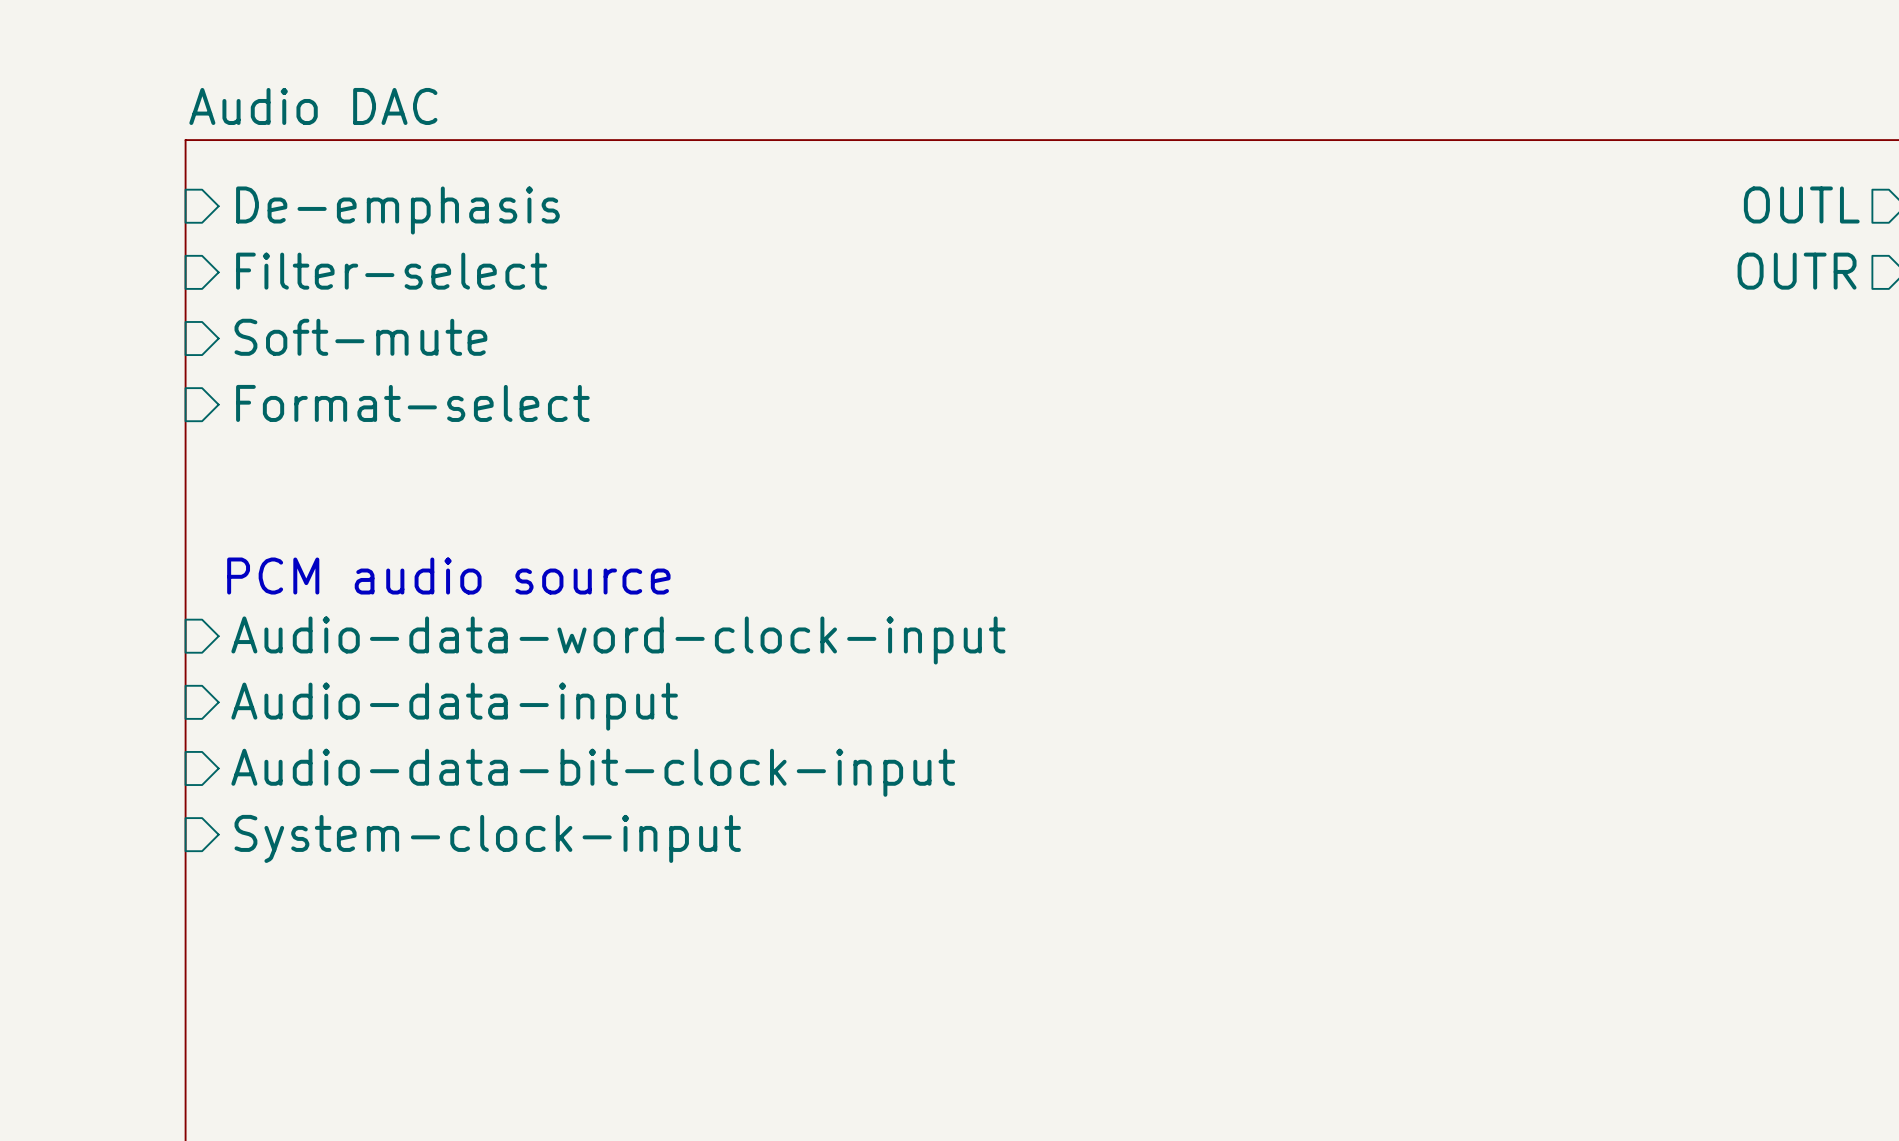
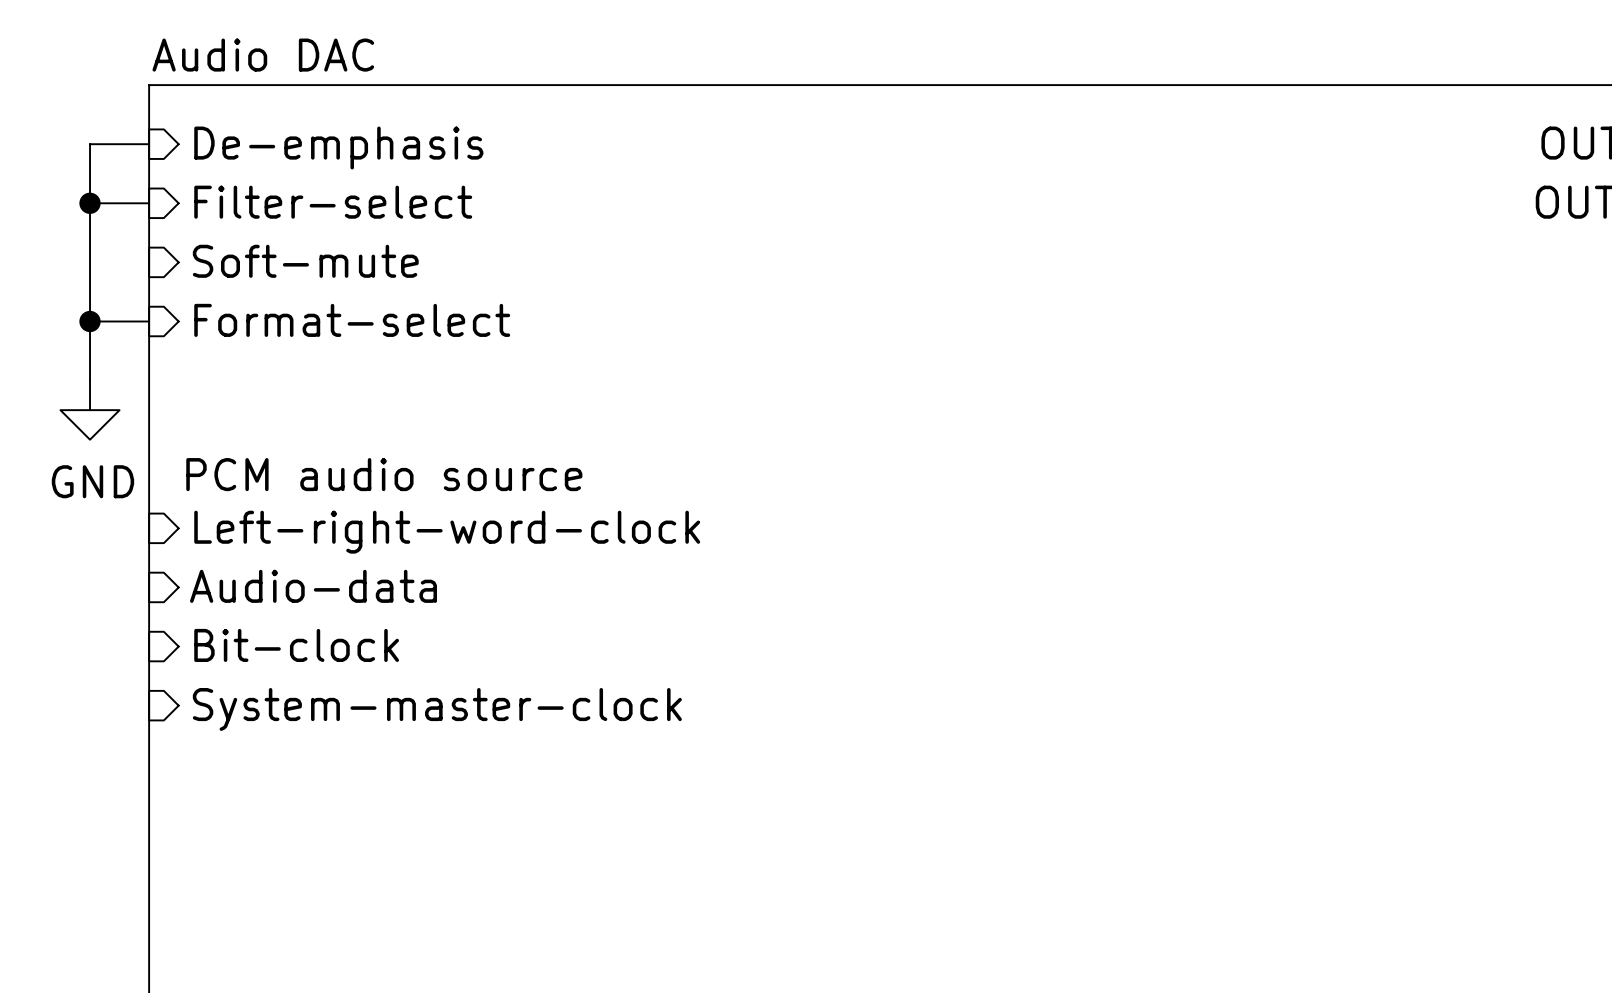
wire: none -> (149, 144) (90, 144) (90, 380)
wire: none -> (90, 203) (149, 203)
junction: none -> (90, 203)
wire: none -> (90, 321) (149, 321)
junction: none -> (90, 321)
power symbol: none -> GND (90, 410)
sheet pin: Audio-data-word-clock-input (618, 640) -> Left-right-word-clock (447, 532)
sheet pin: Audio-data-input (454, 706) -> Audio-data (313, 586)
sheet pin: Audio-data-bit-clock-input (593, 772) -> Bit-clock (296, 645)
sheet pin: System-clock-input (487, 838) -> System-master-clock (437, 709)

